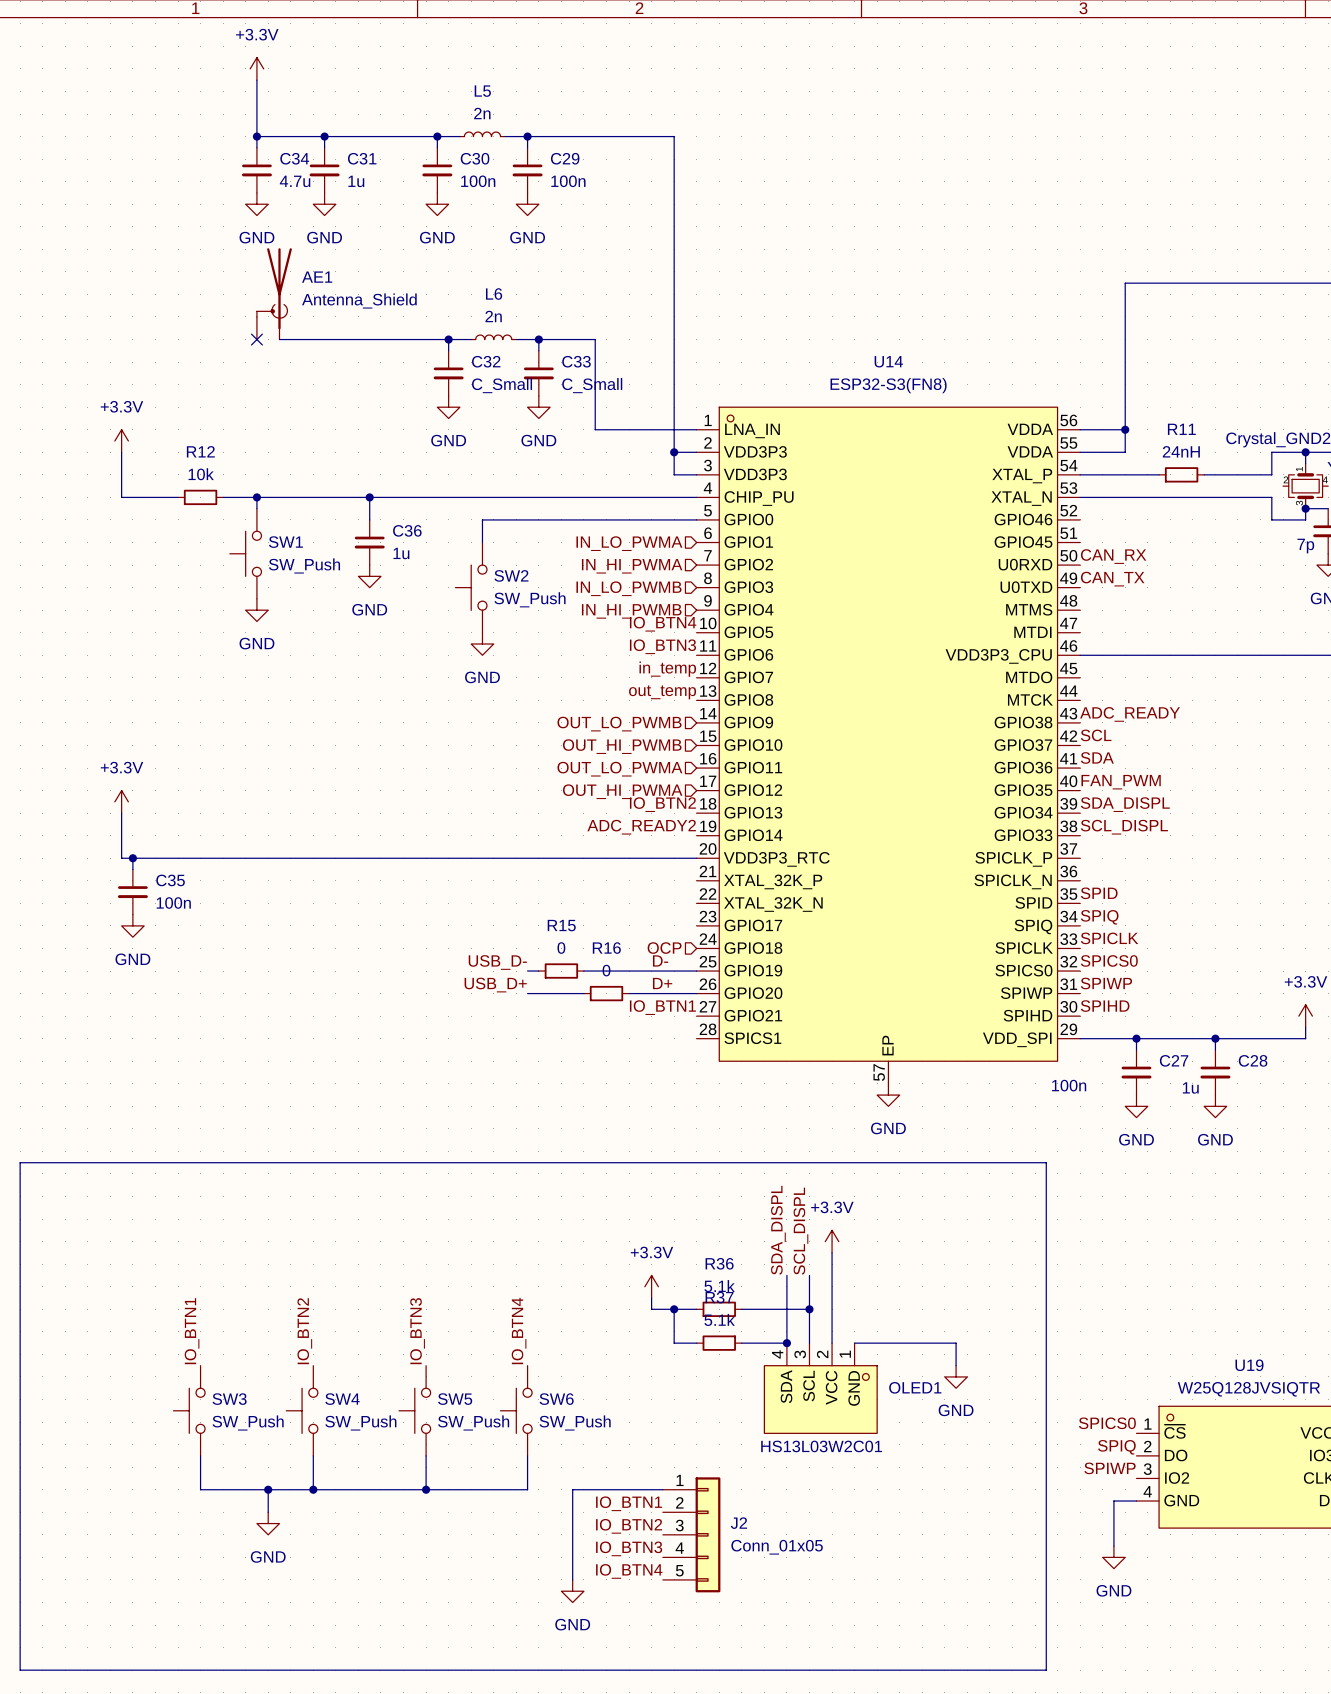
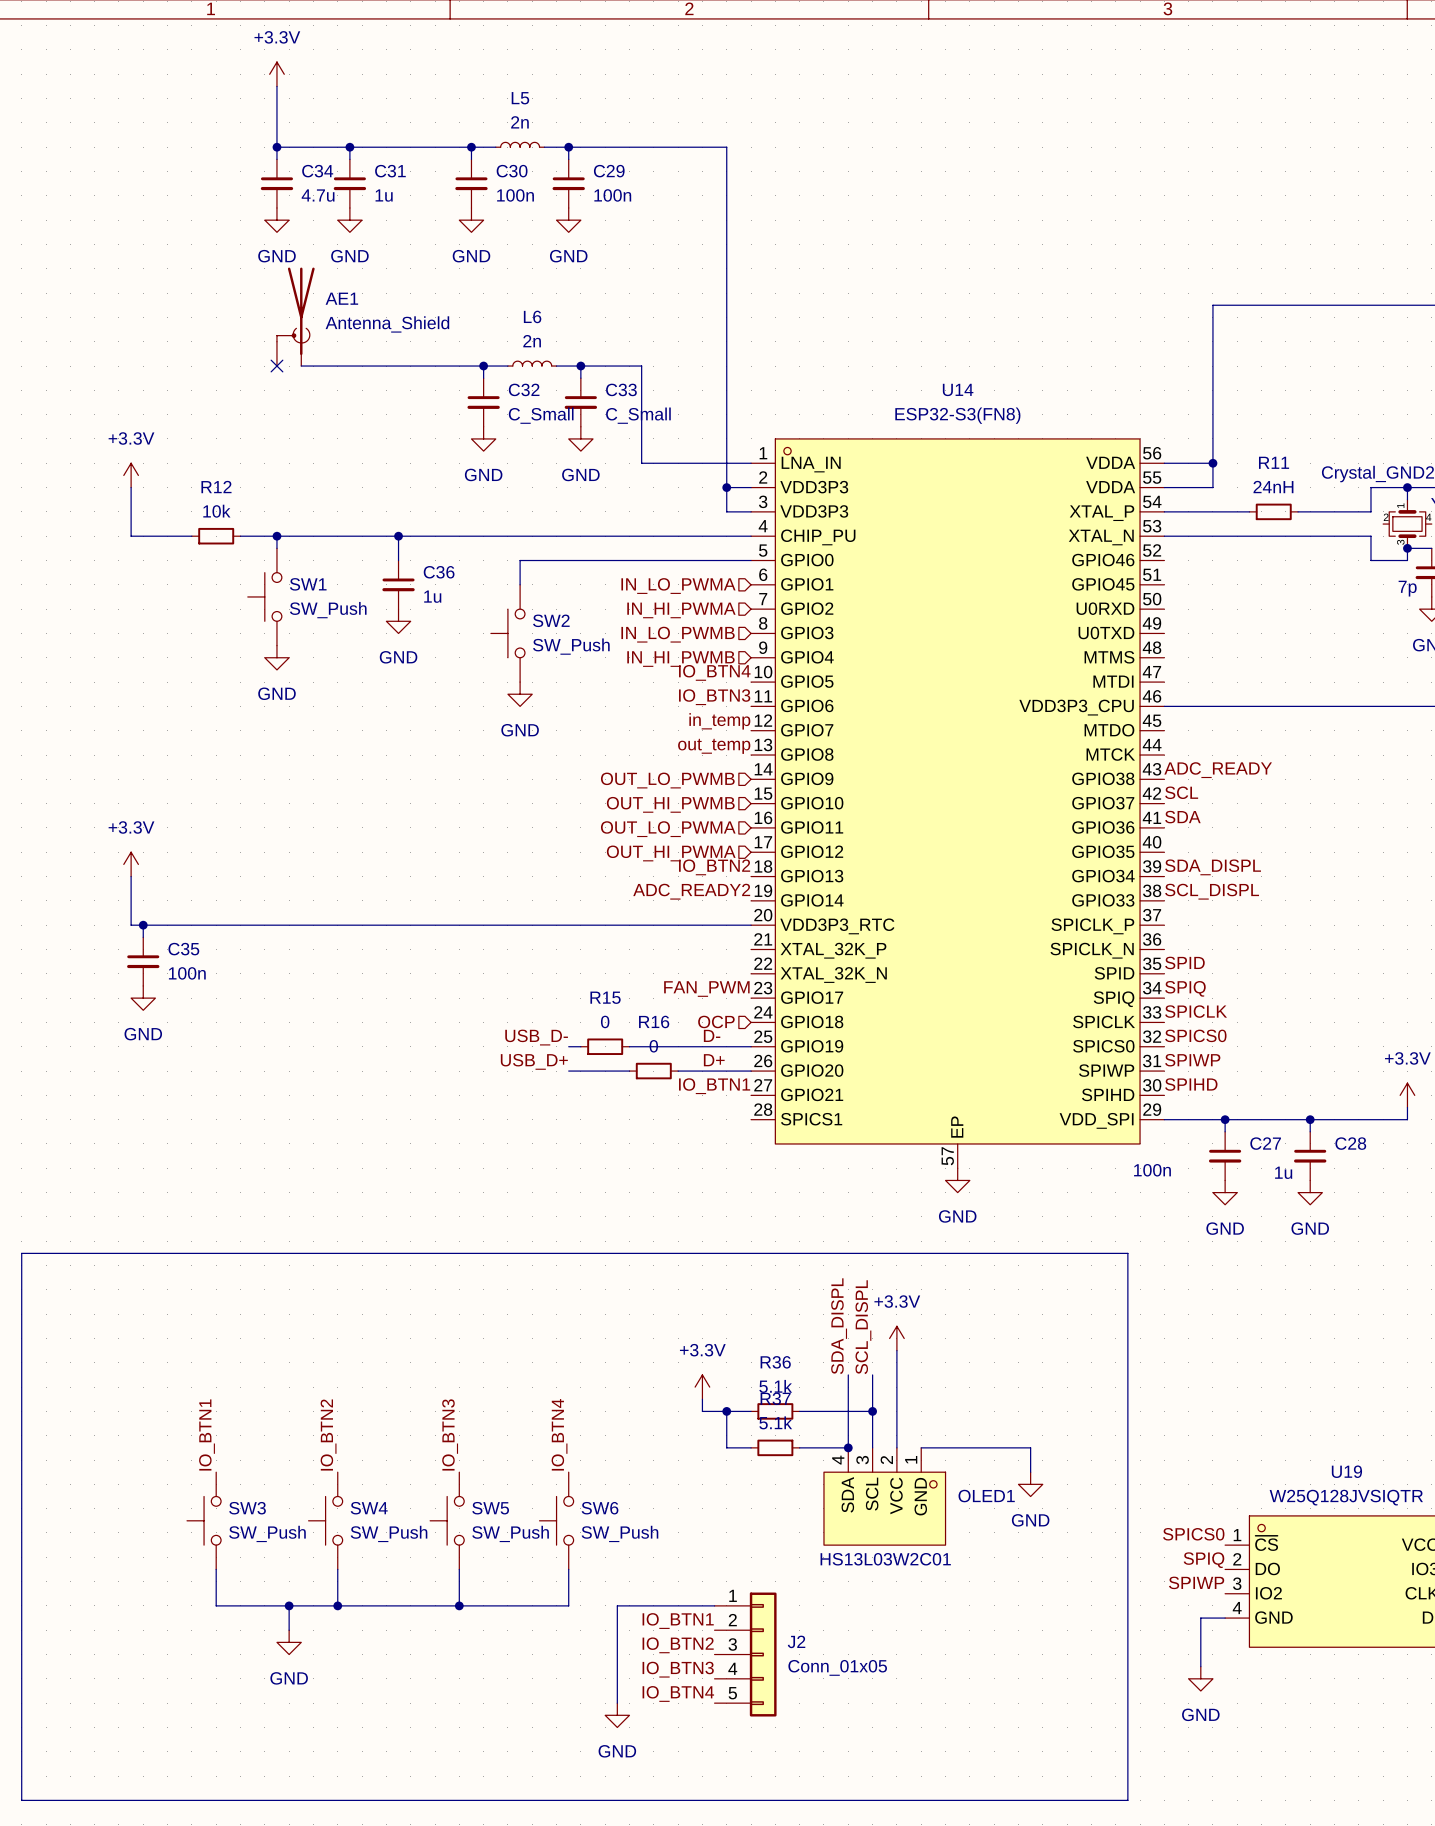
label: CAN_RX (1113, 556) -> none
label: CAN_TX (1112, 579) -> none
label: FAN_PWM (1121, 782) -> none
label: none -> FAN_PWM (706, 989)

